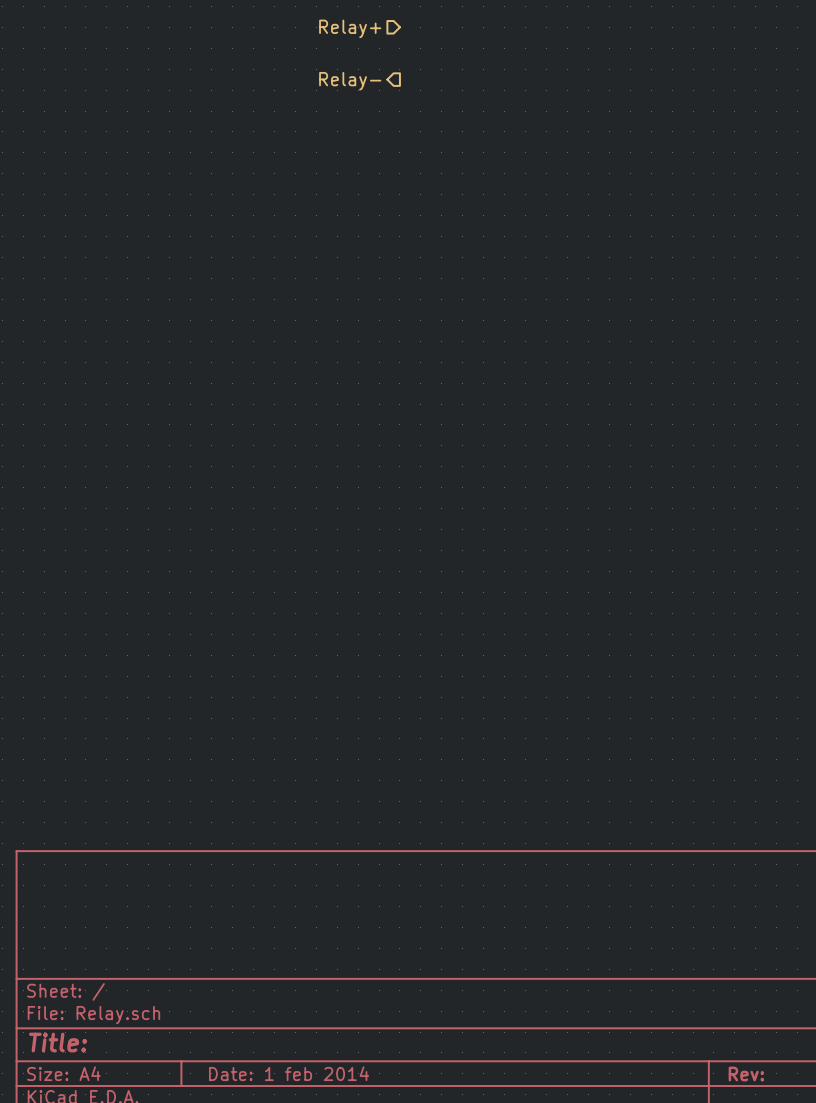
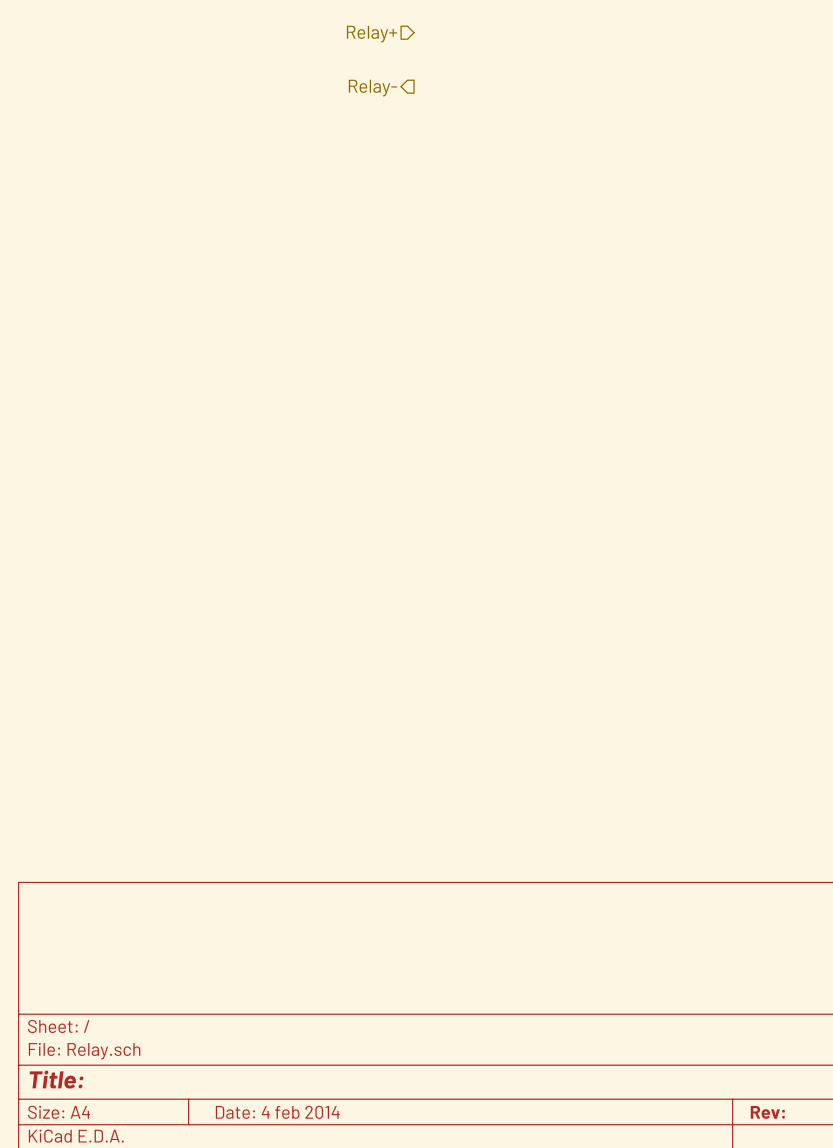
title block: Date: 1 feb 2014 (289, 1073) -> Date: 4 feb 2014 (277, 1112)

